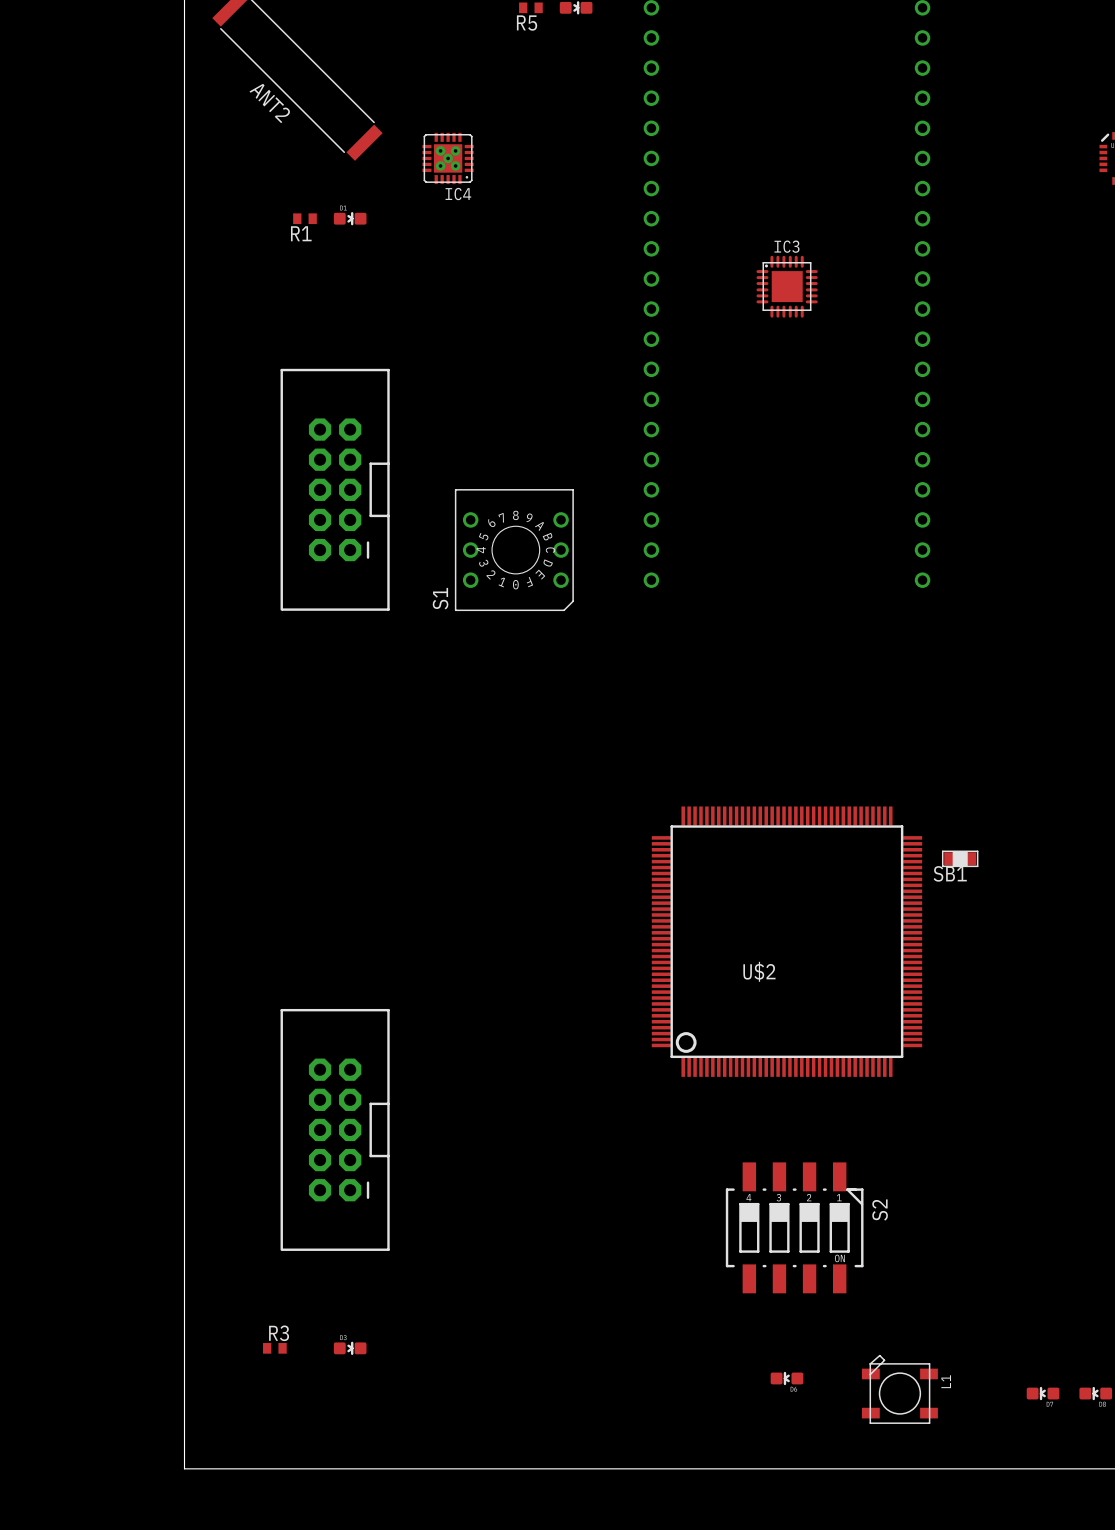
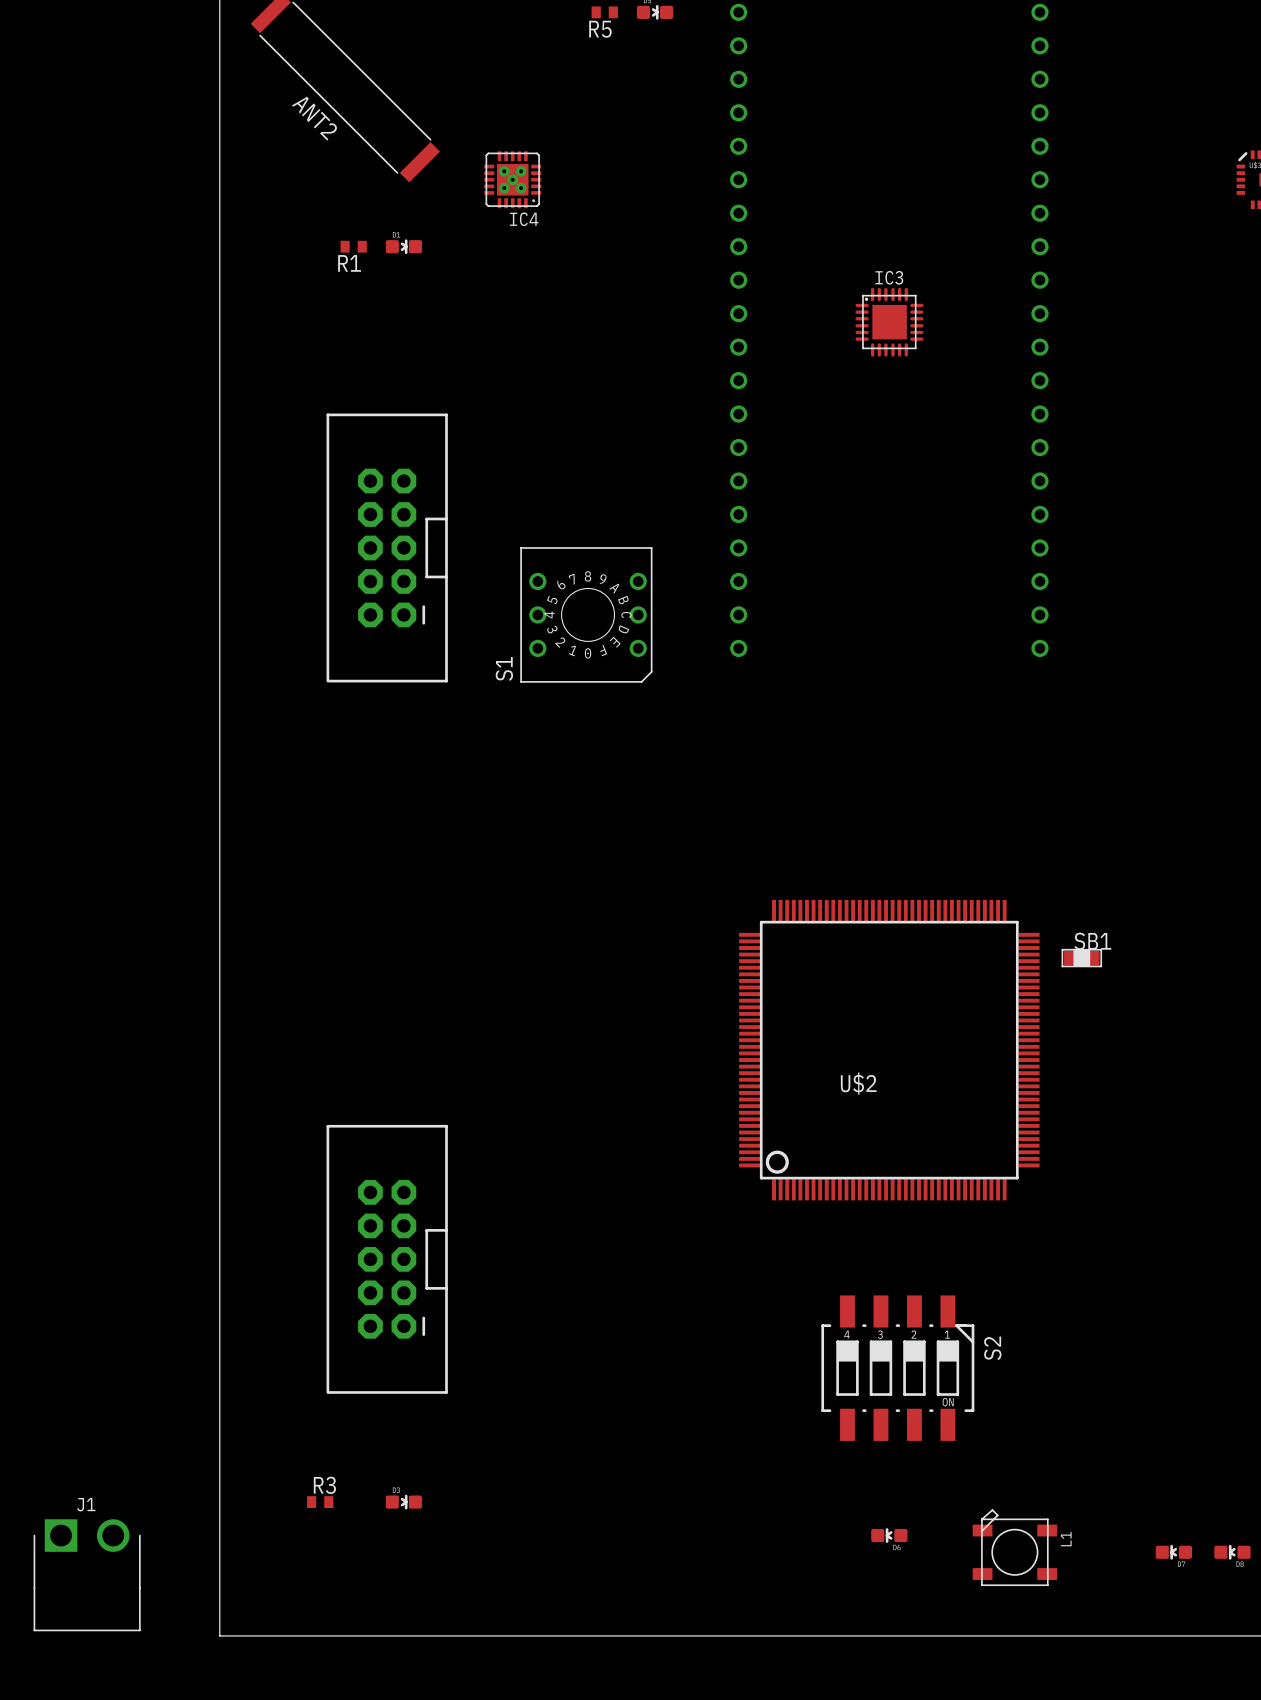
SB1 name position: SB1 (950, 873) -> SB1 (1092, 941)
J1: none -> (87, 1575)

